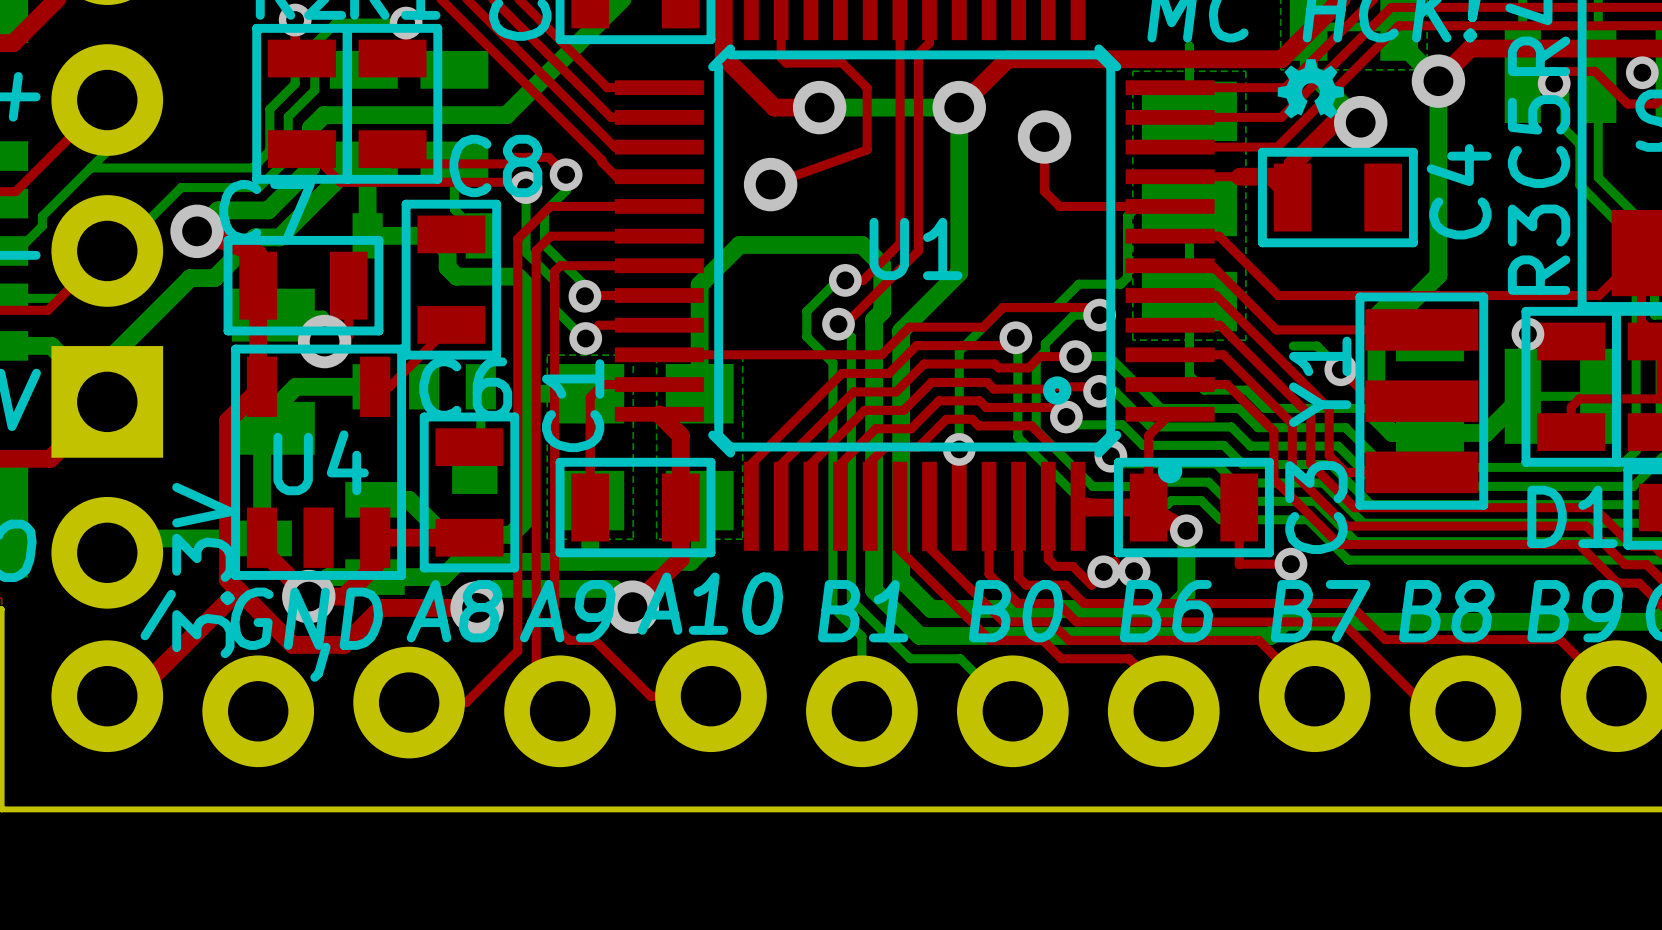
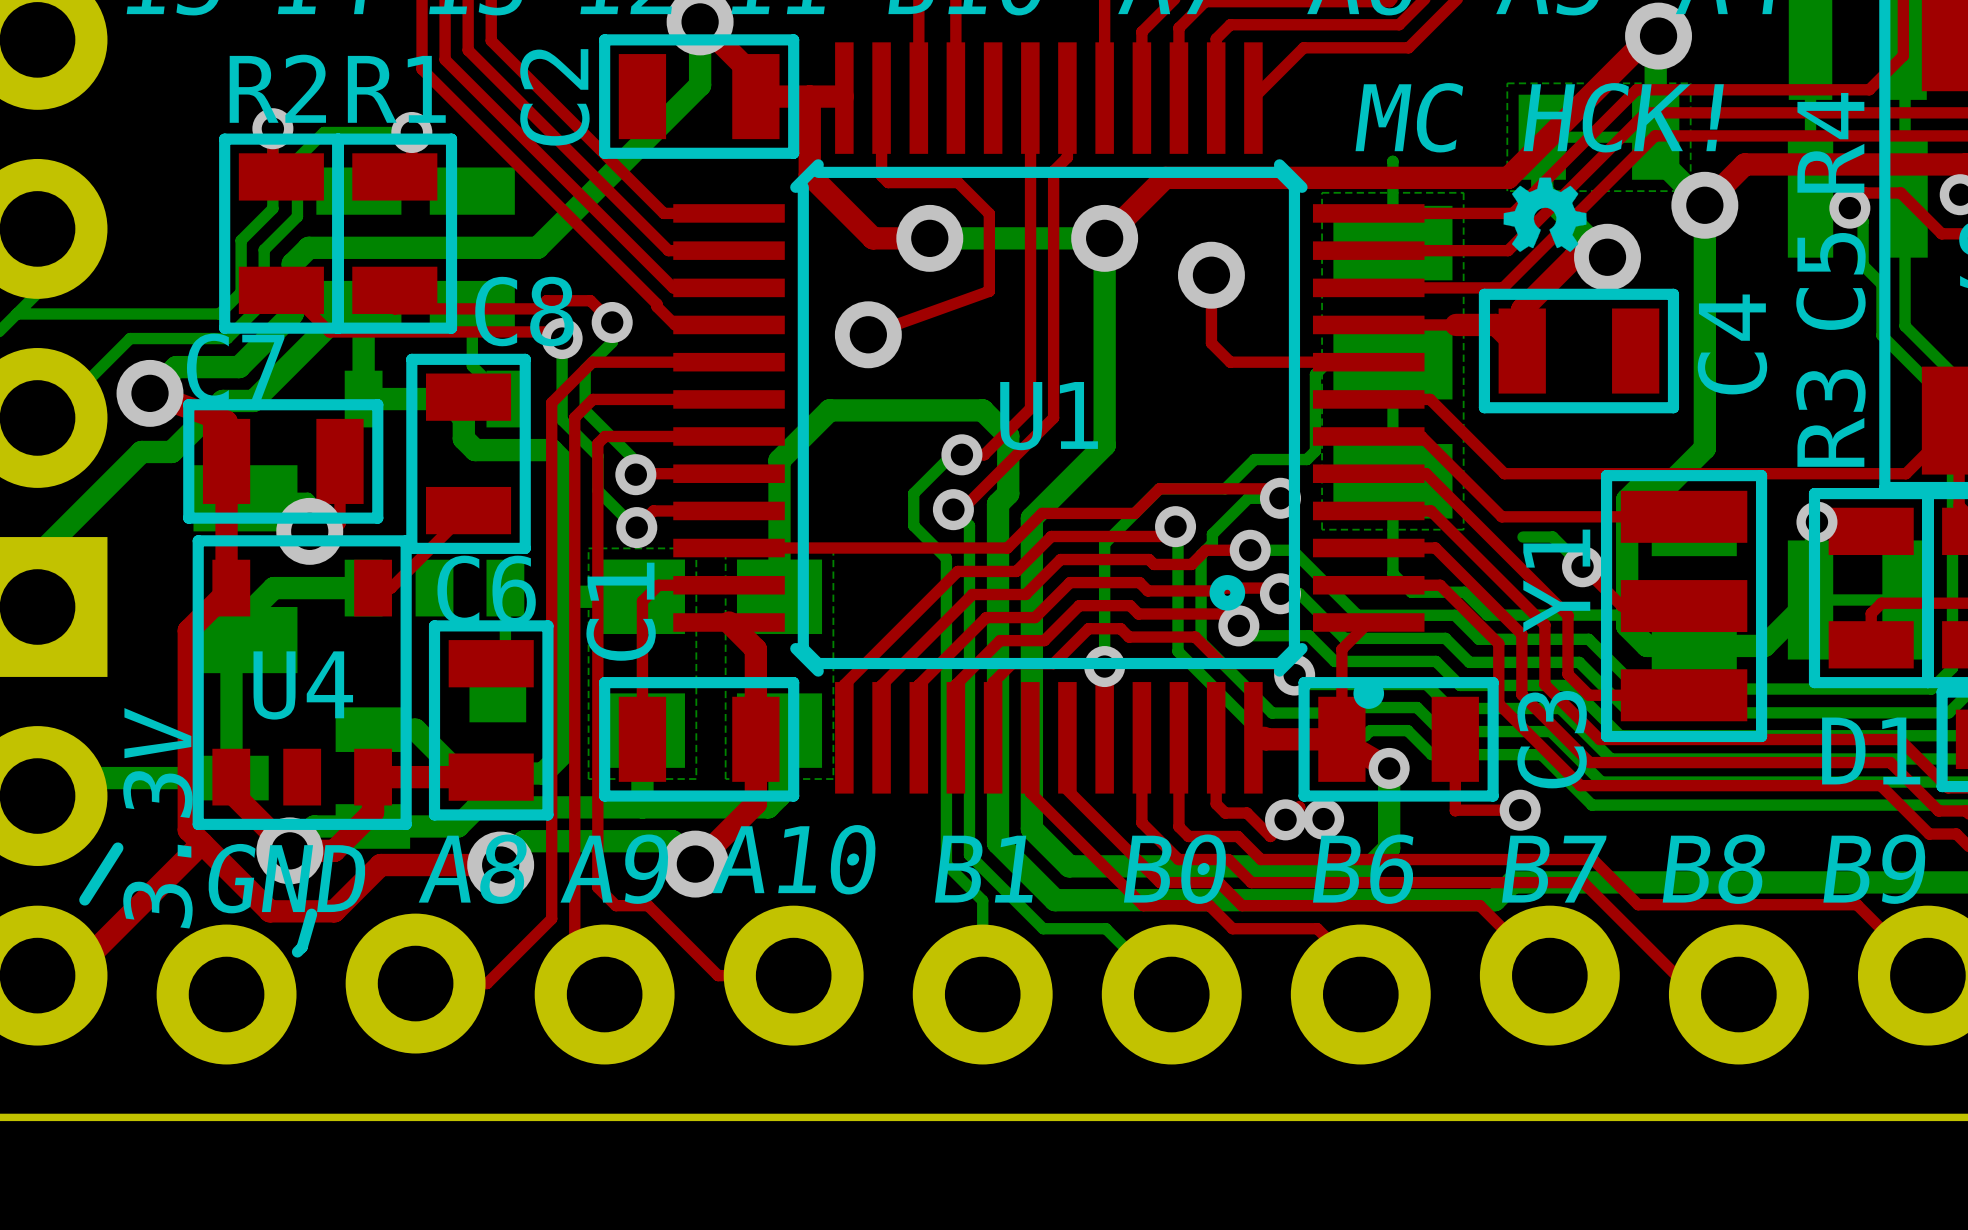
Y1 footprint: [1355, 292, 1489, 510] -> [1600, 470, 1768, 743]
U4 footprint: [231, 344, 407, 580] -> [192, 535, 412, 830]

